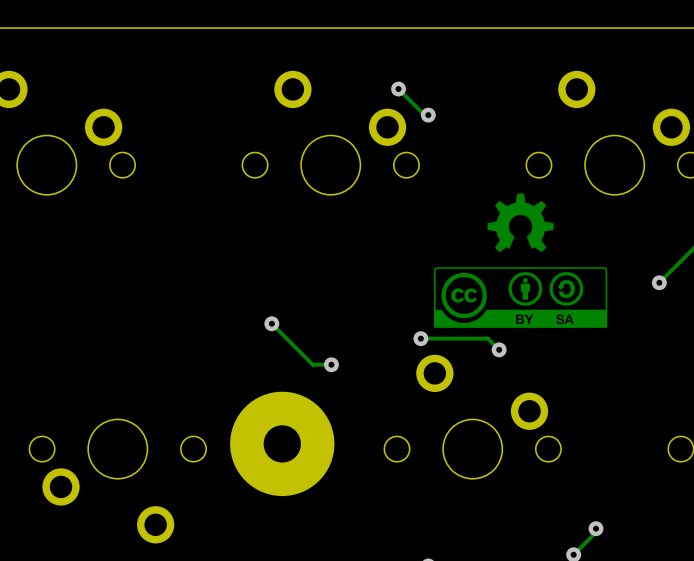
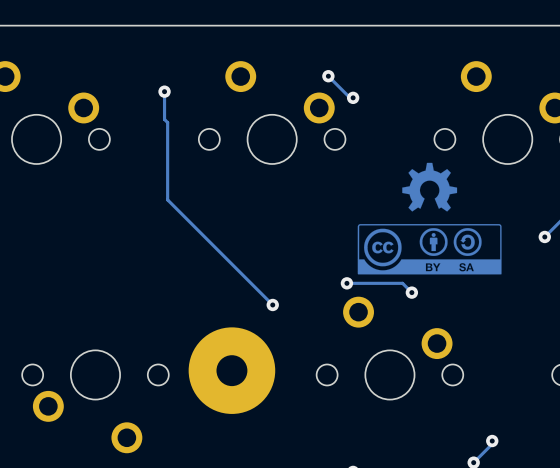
via: none -> (164, 91)
track: (271, 323) (312, 364) (331, 364) -> (164, 91) (164, 119) (167, 122) (167, 199) (272, 304)
via: (271, 323) -> none

